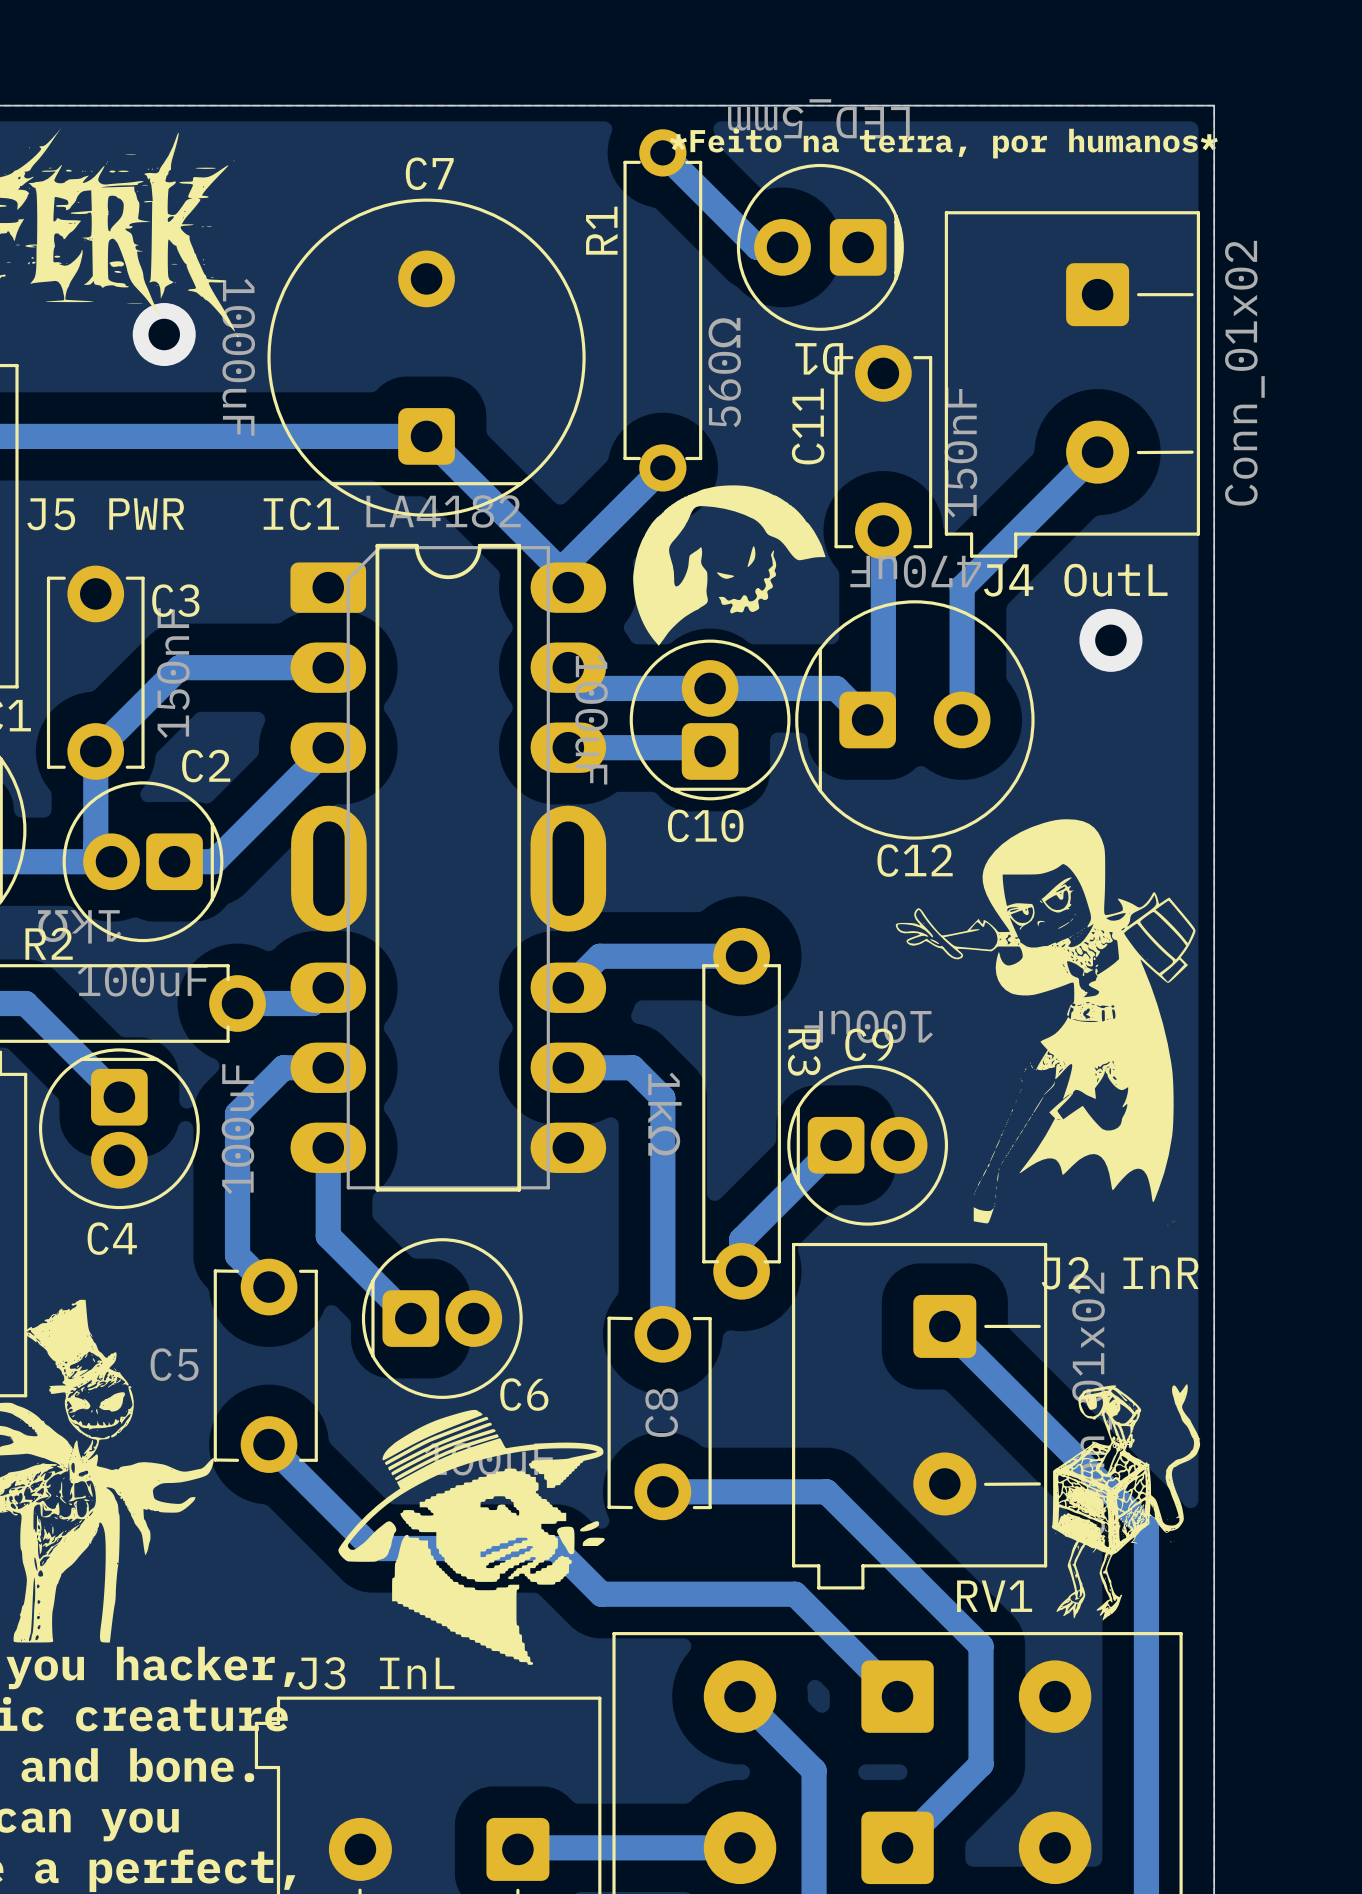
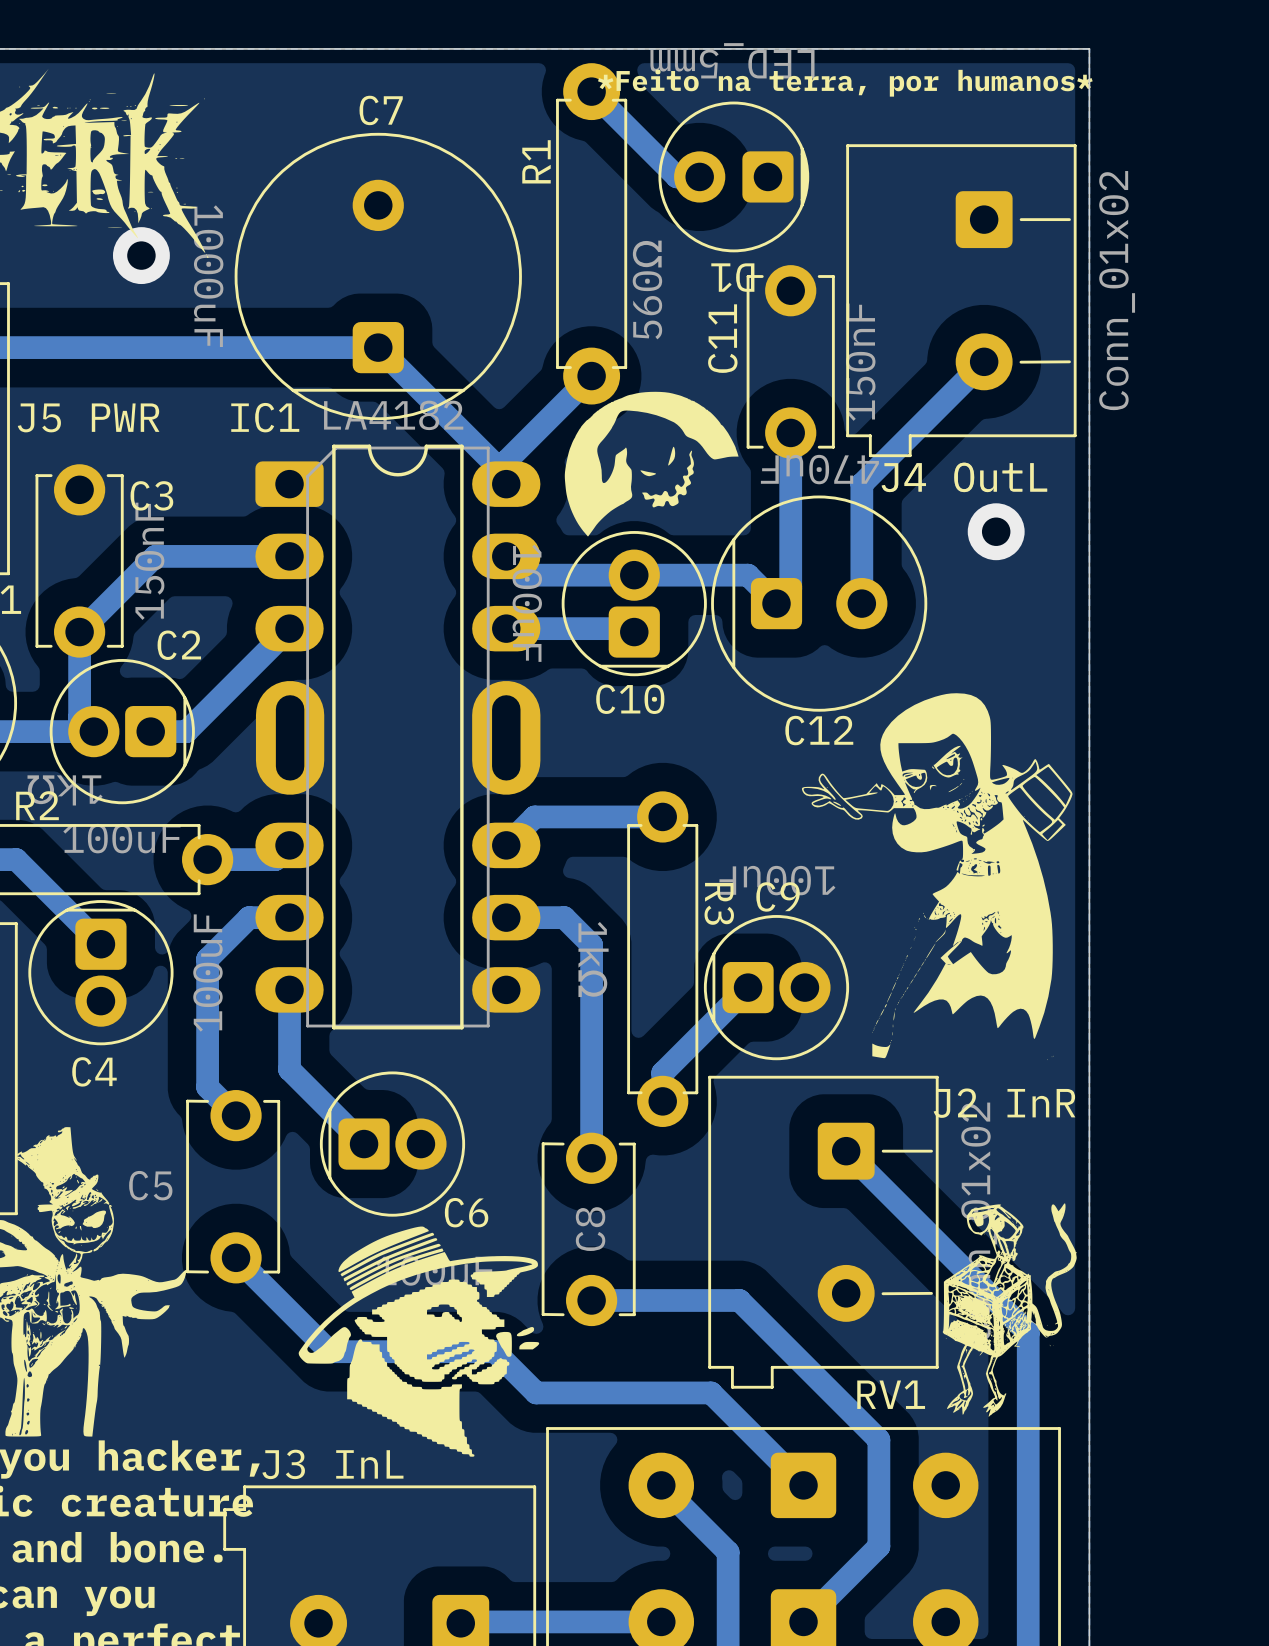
R1 footprint: [623, 129, 703, 492] -> [556, 63, 628, 405]

